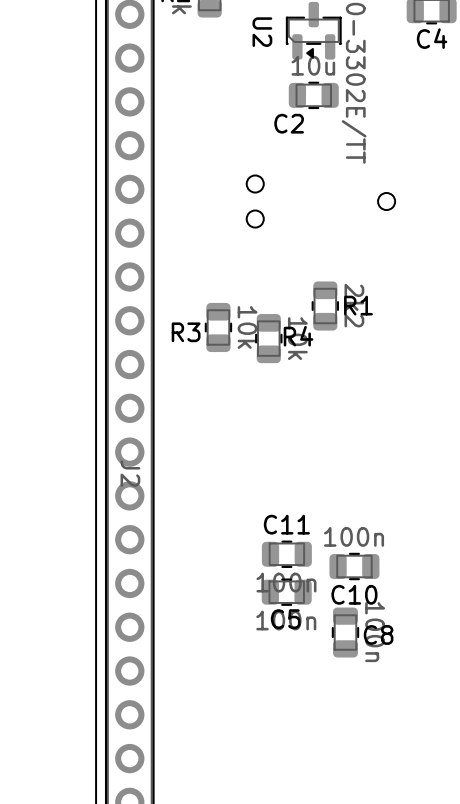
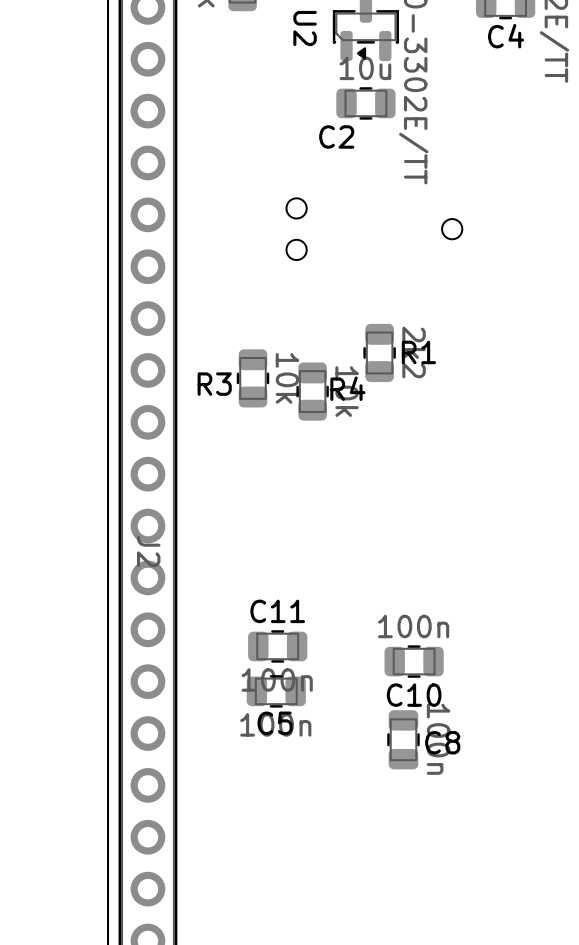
C11 position: (286, 554) -> (277, 646)
C5 position: (286, 592) -> (276, 691)

